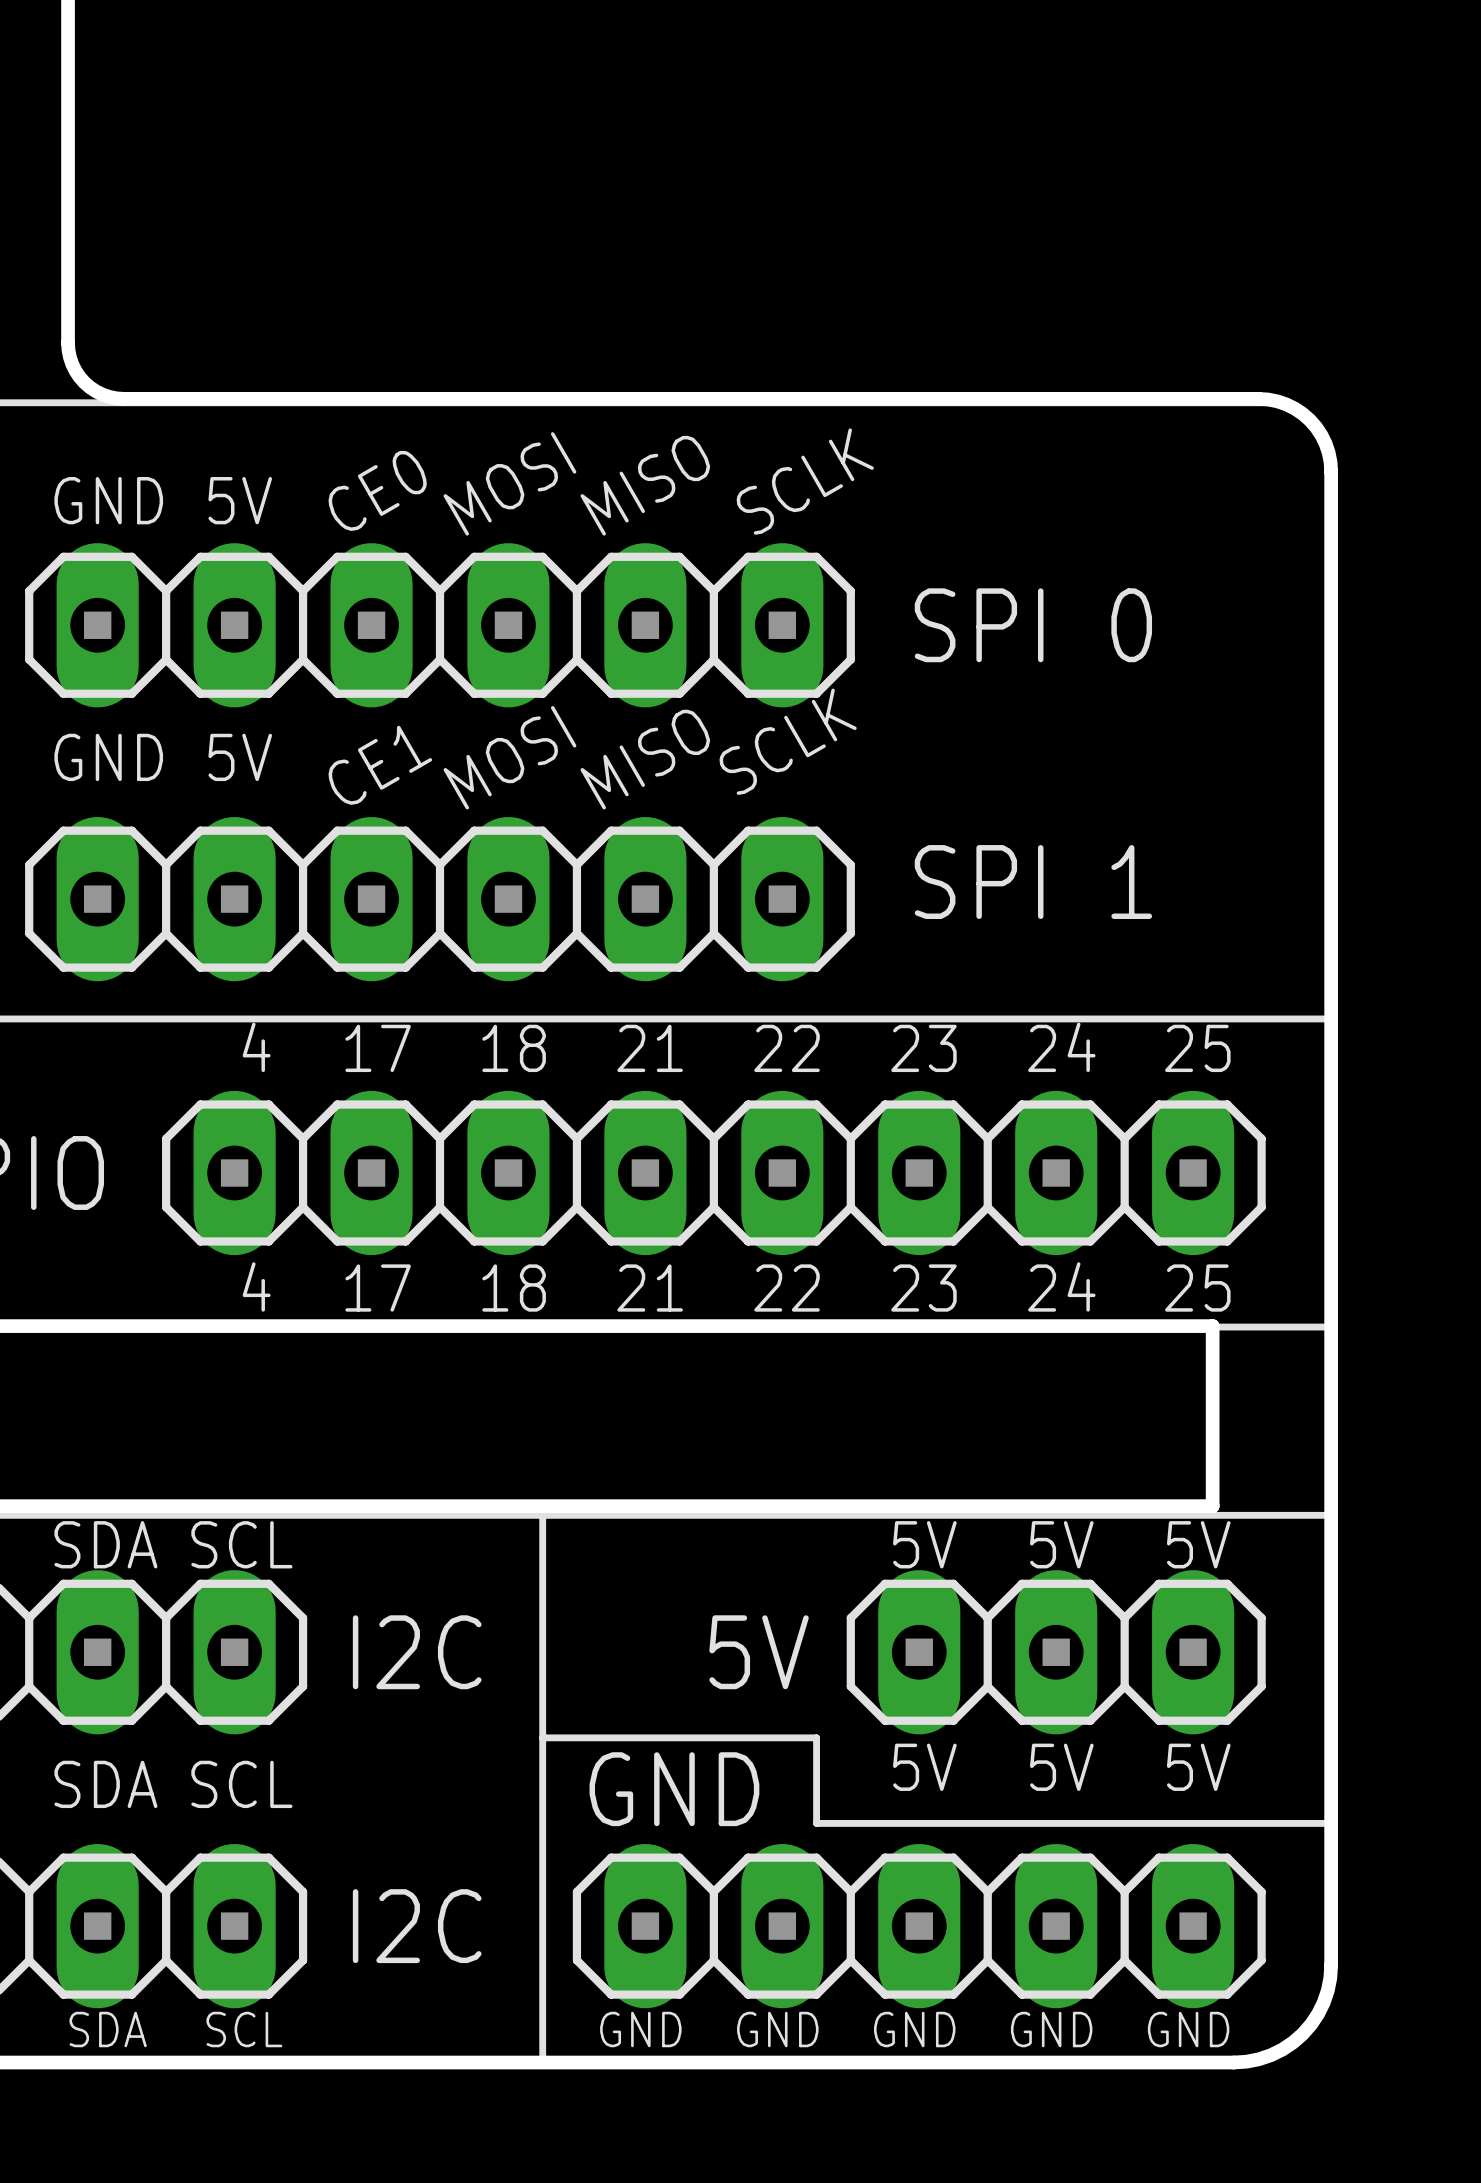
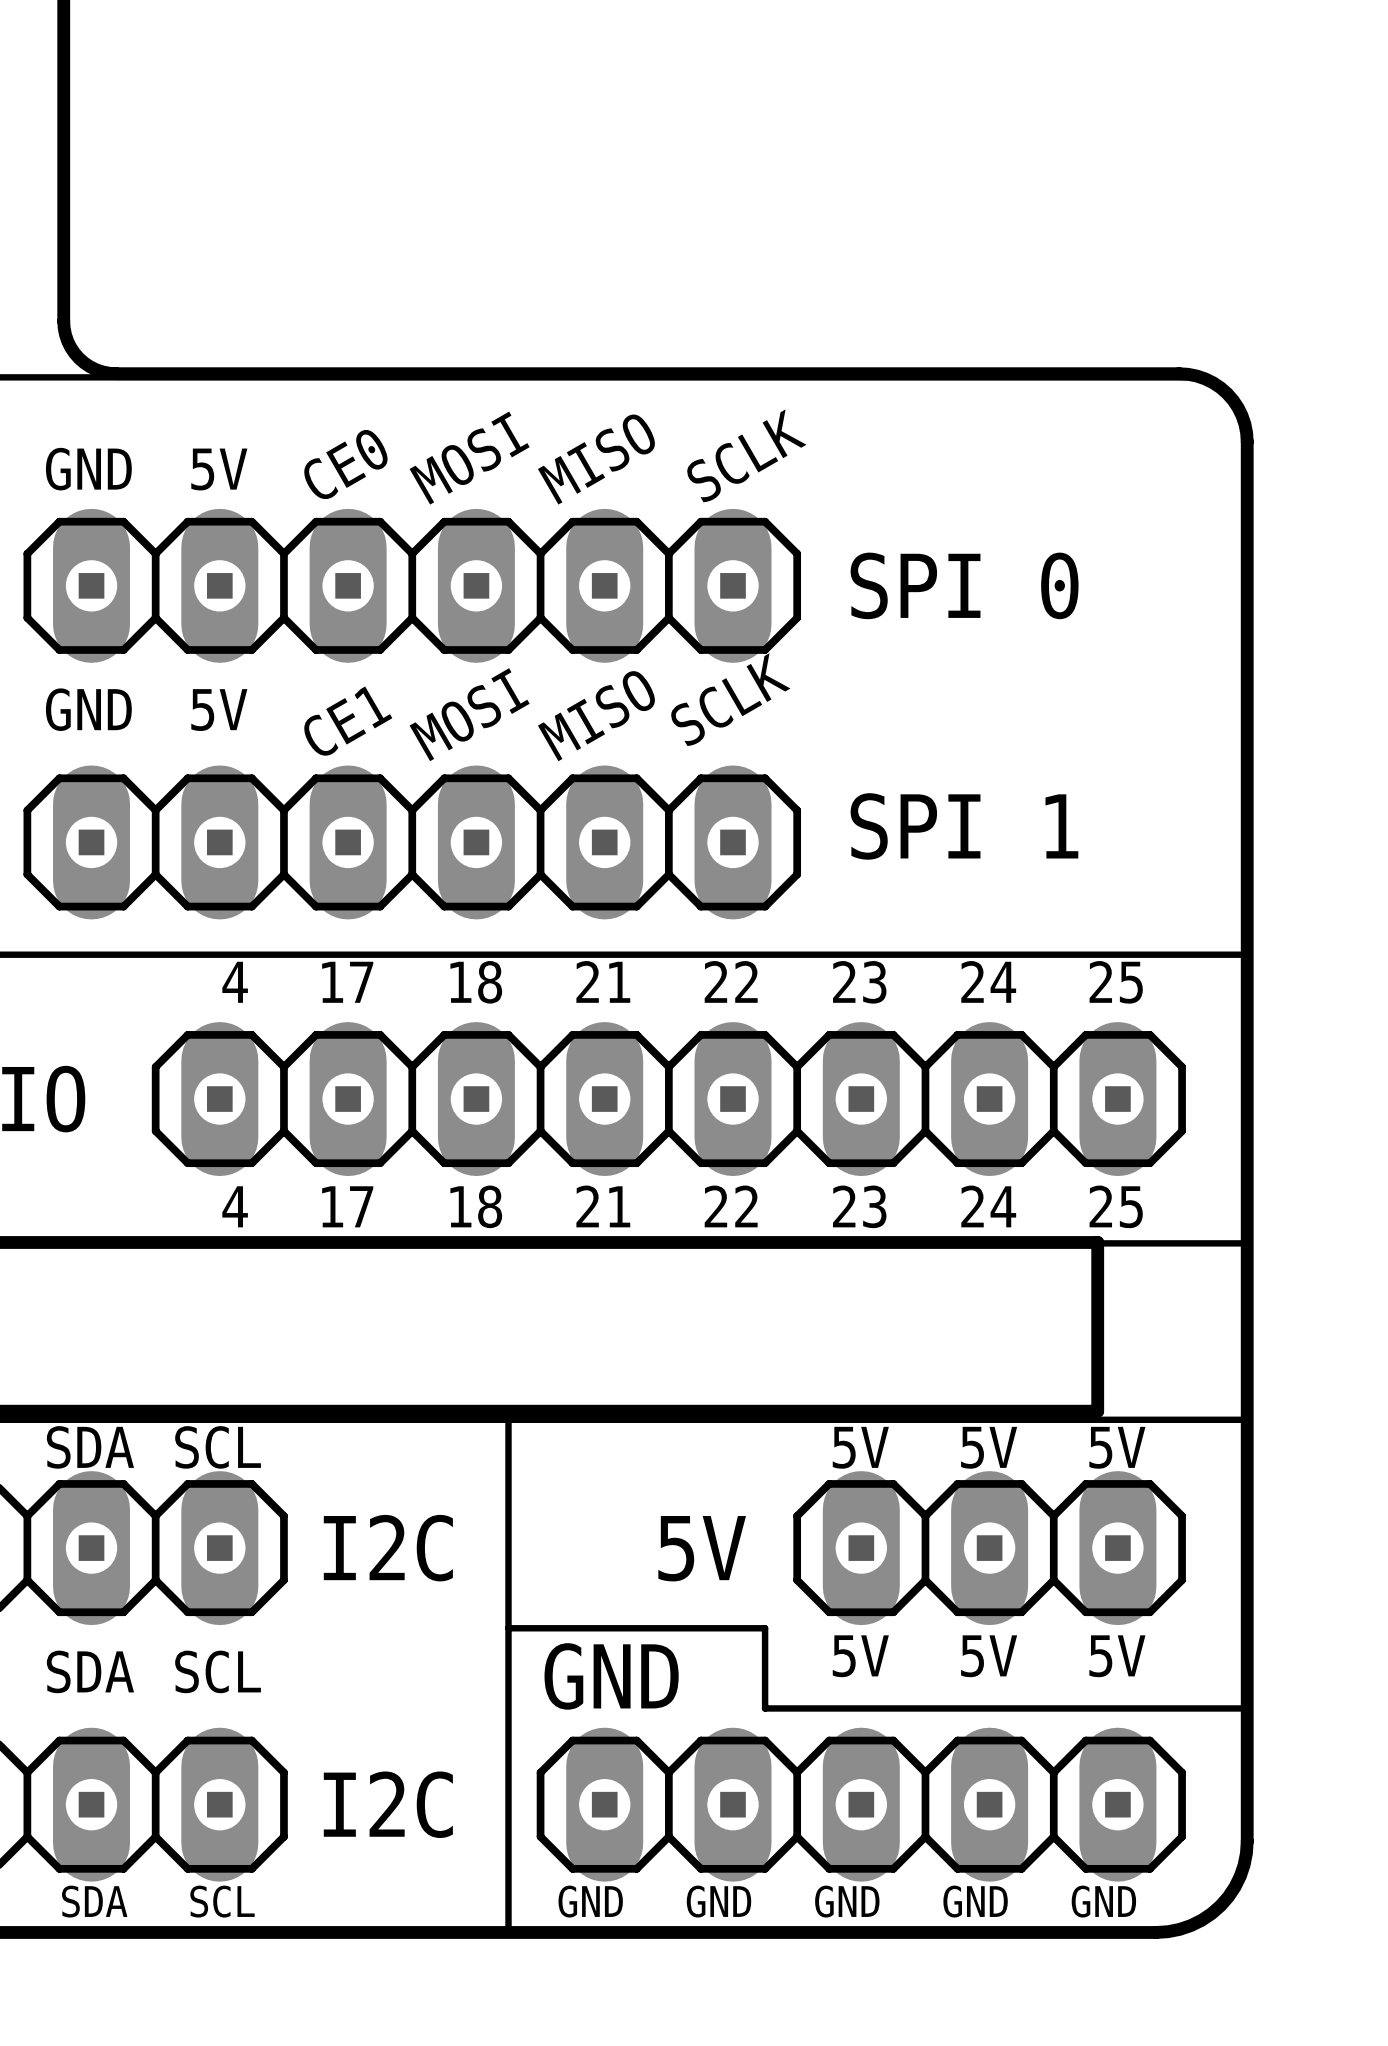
board edge: (1171, 1326) (1212, 1326) (1212, 1506) (1171, 1506) -> (1097, 1242) (1097, 1411)

